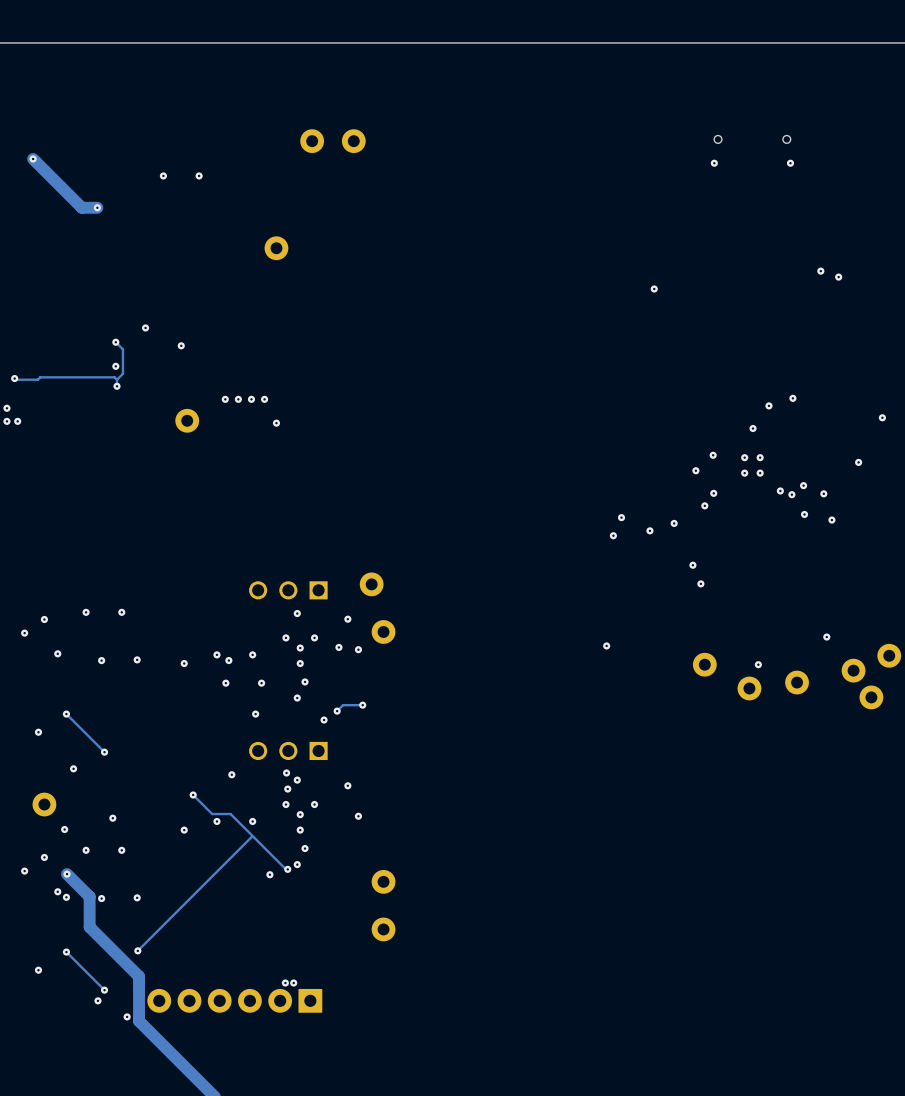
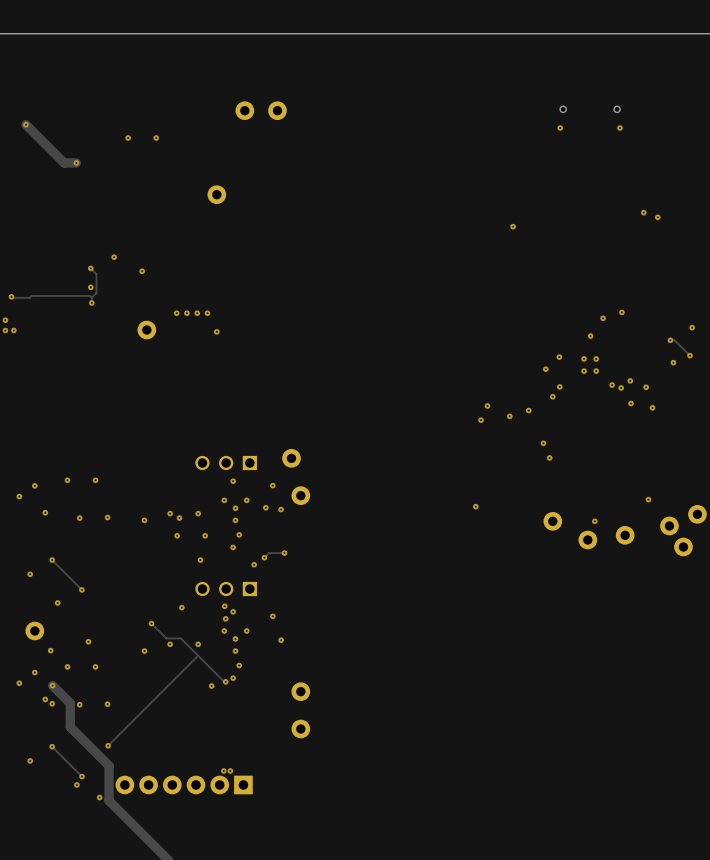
track: none -> (670, 340) (674, 340) (689, 355)
via: none -> (670, 340)
via: none -> (689, 355)

